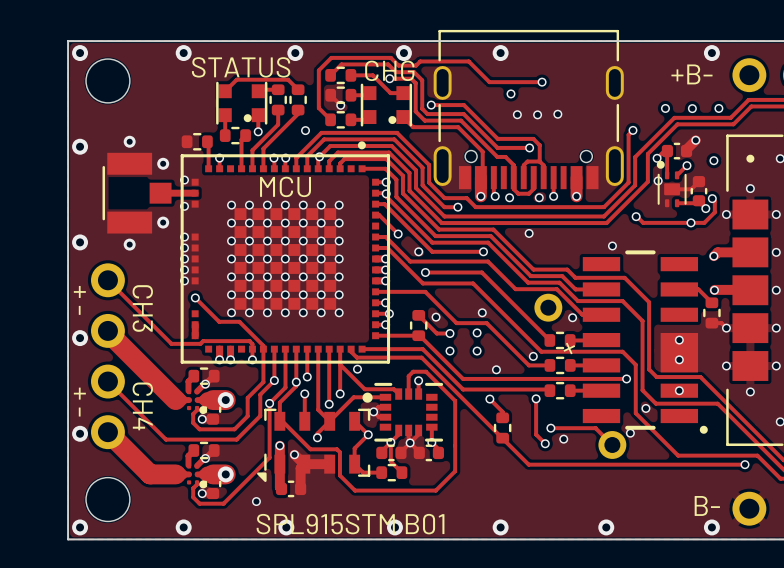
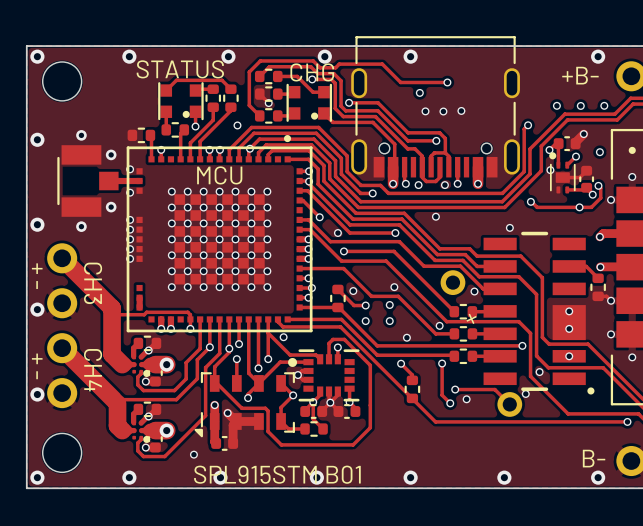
track width: thin (107, 280) (164, 336) -> thick (62, 258) (112, 308)
track: (195, 297) (219, 321) (239, 321) (263, 345) (263, 349) -> none
via: (195, 297) -> none
track: (107, 330) (164, 388) -> (112, 308) (112, 354)
track width: thin (107, 381) (165, 439) -> thick (62, 348) (113, 399)
via: (269, 403) -> none
track: (107, 432) (150, 474) (175, 474) -> (117, 403) (117, 425) (122, 430)

